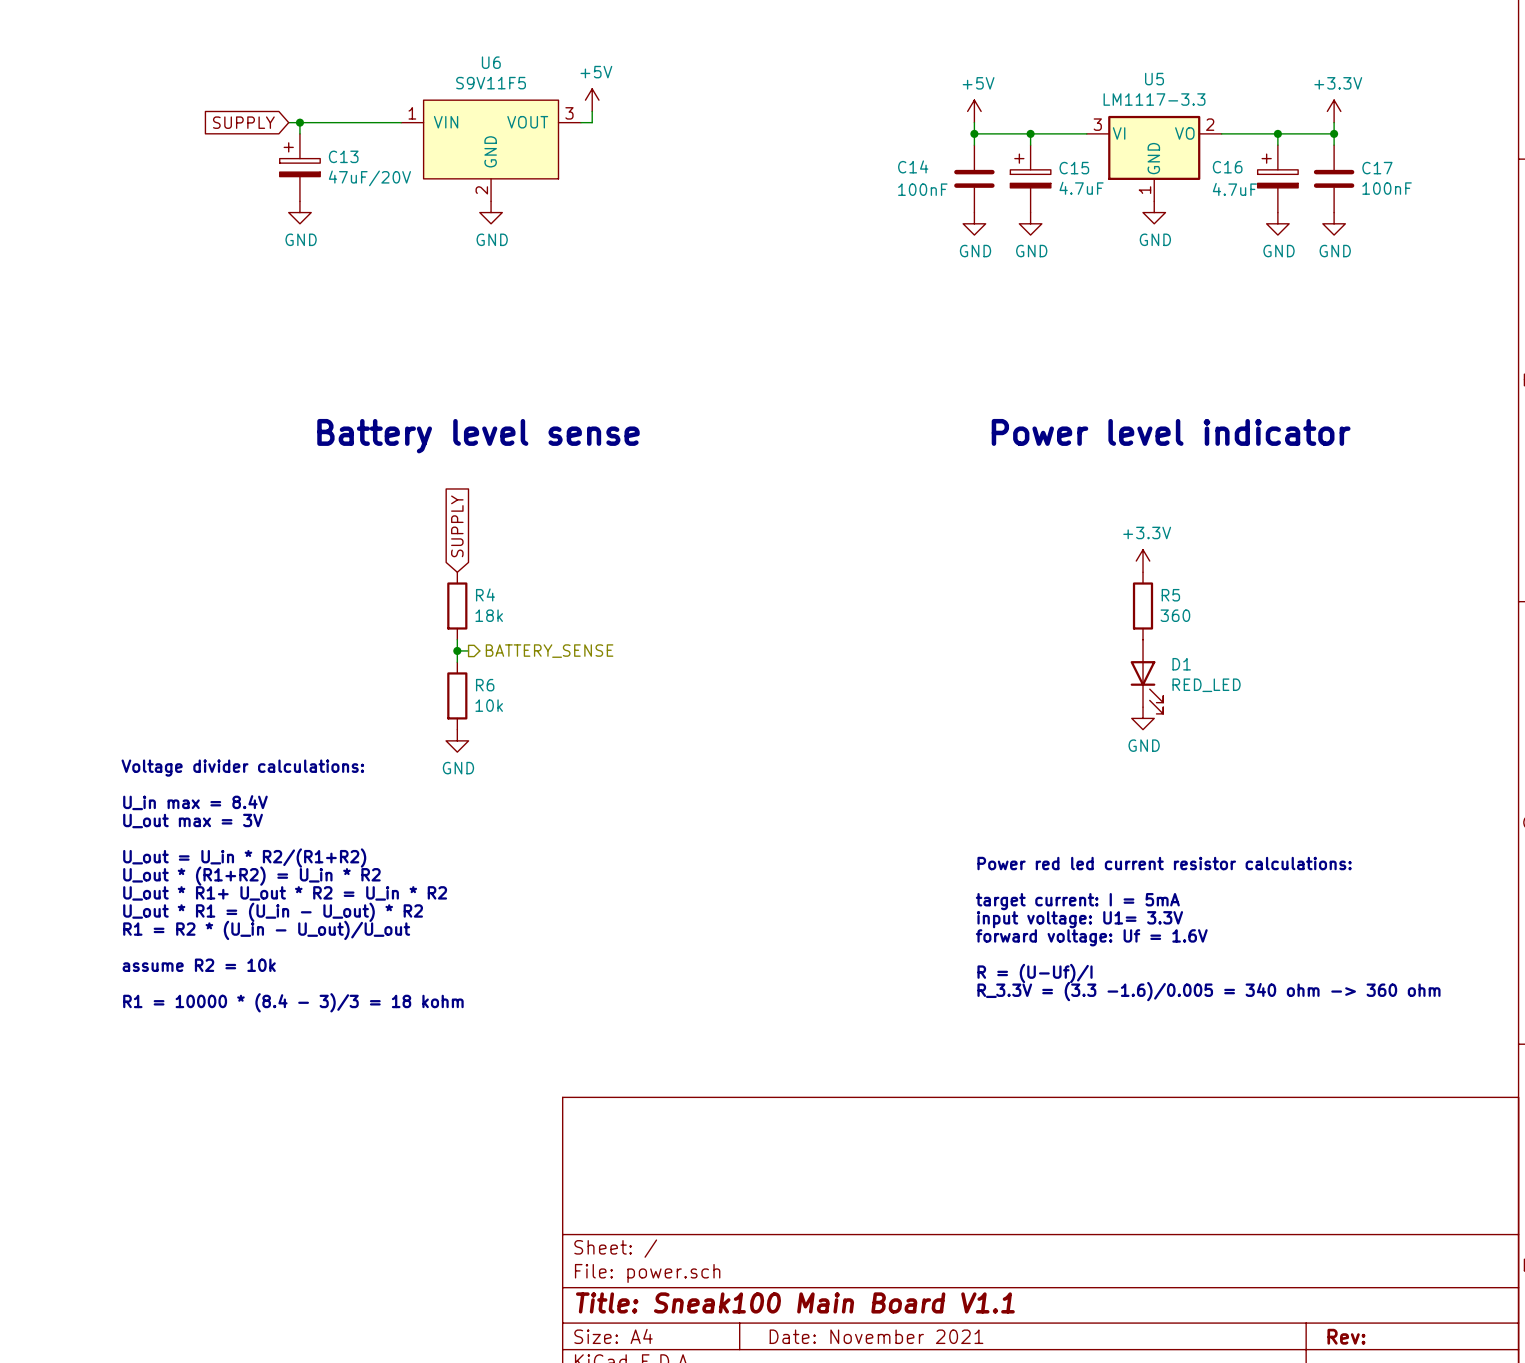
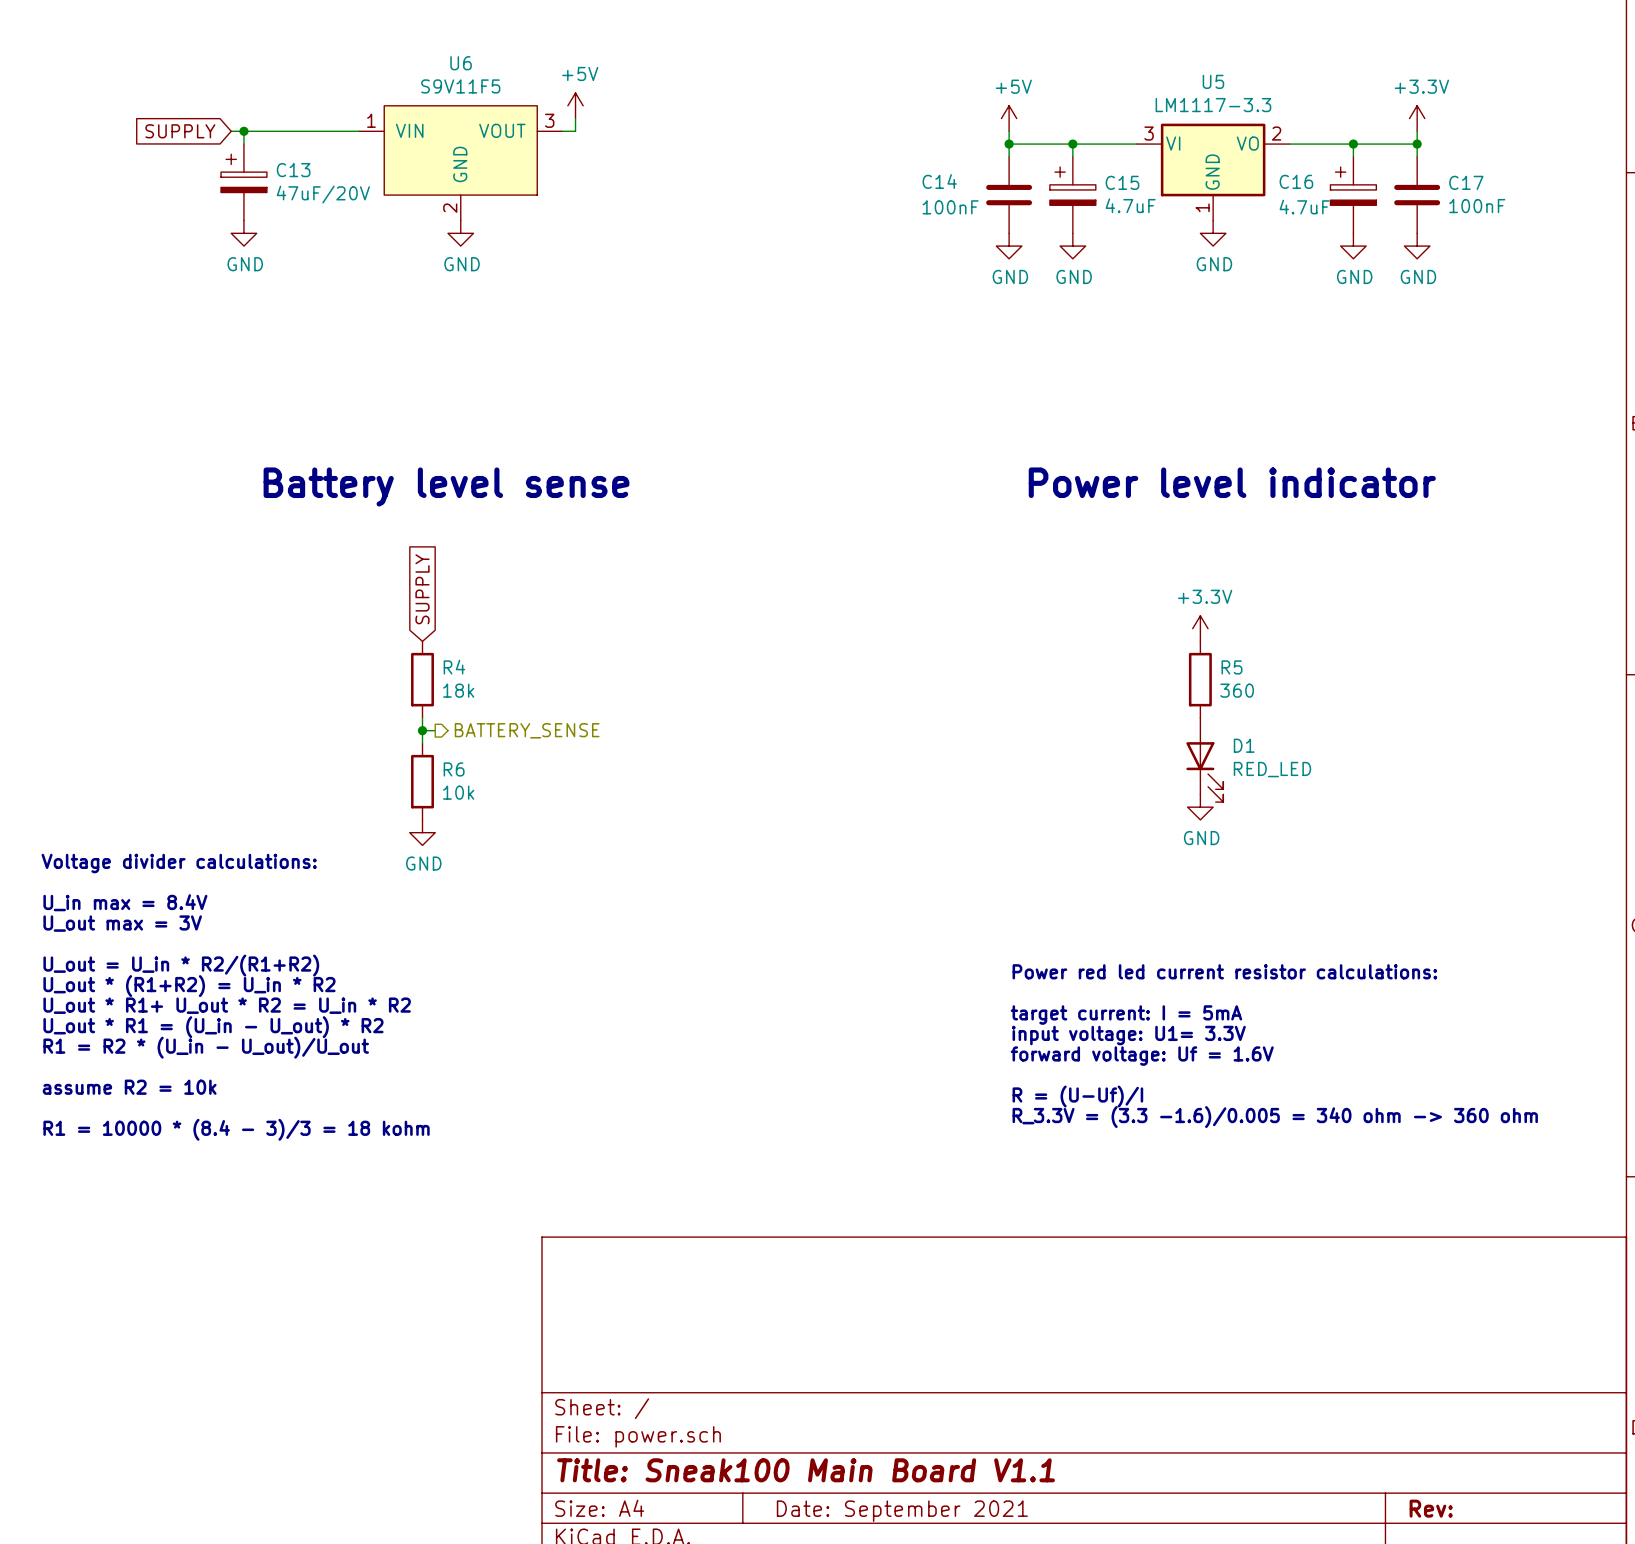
title block: Date: November 2021 (876, 1336) -> Date: September 2021 (902, 1511)

